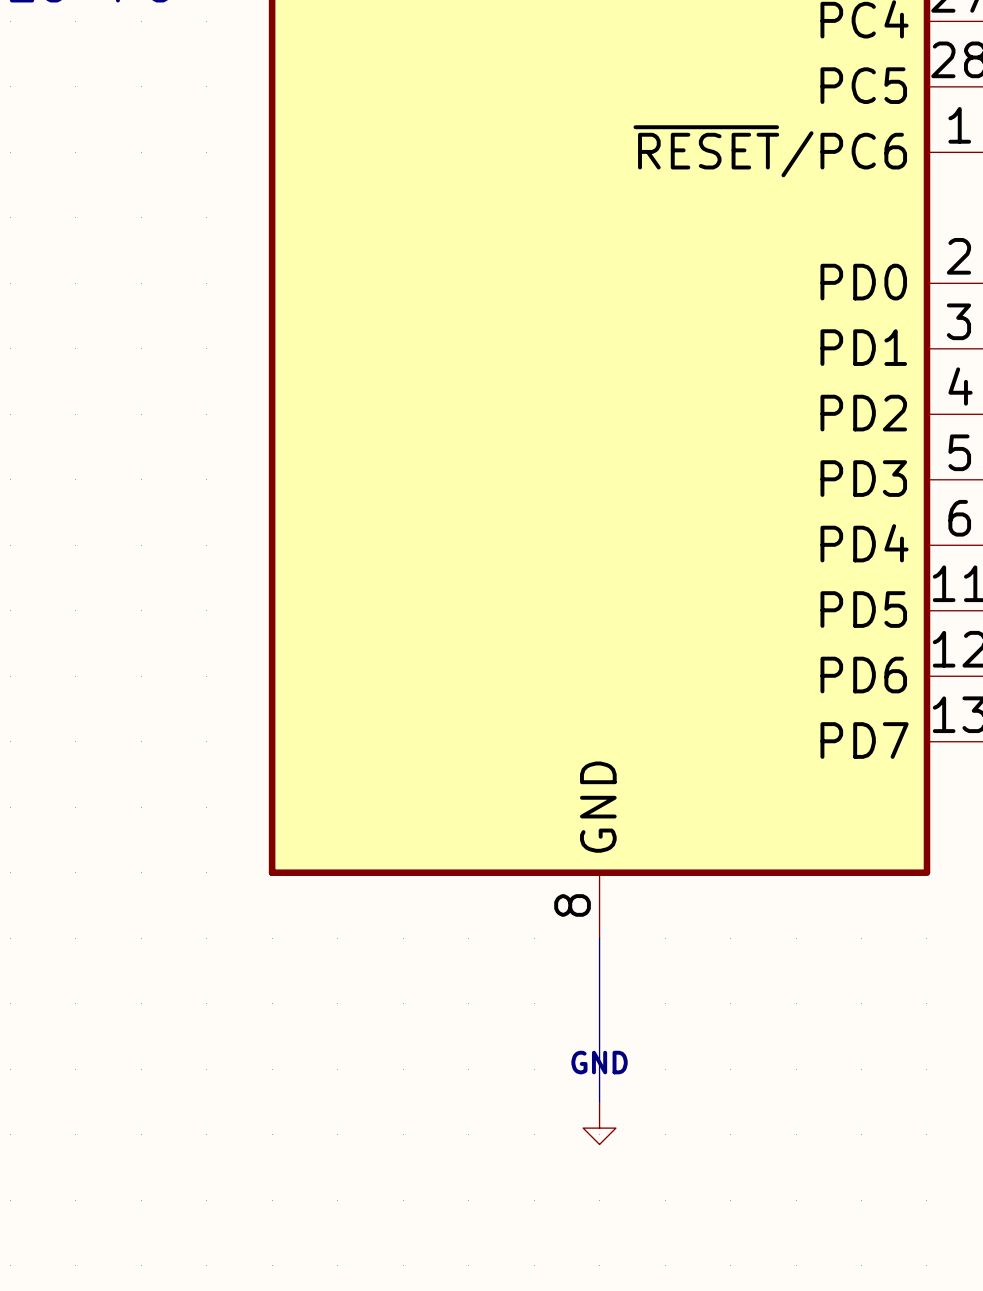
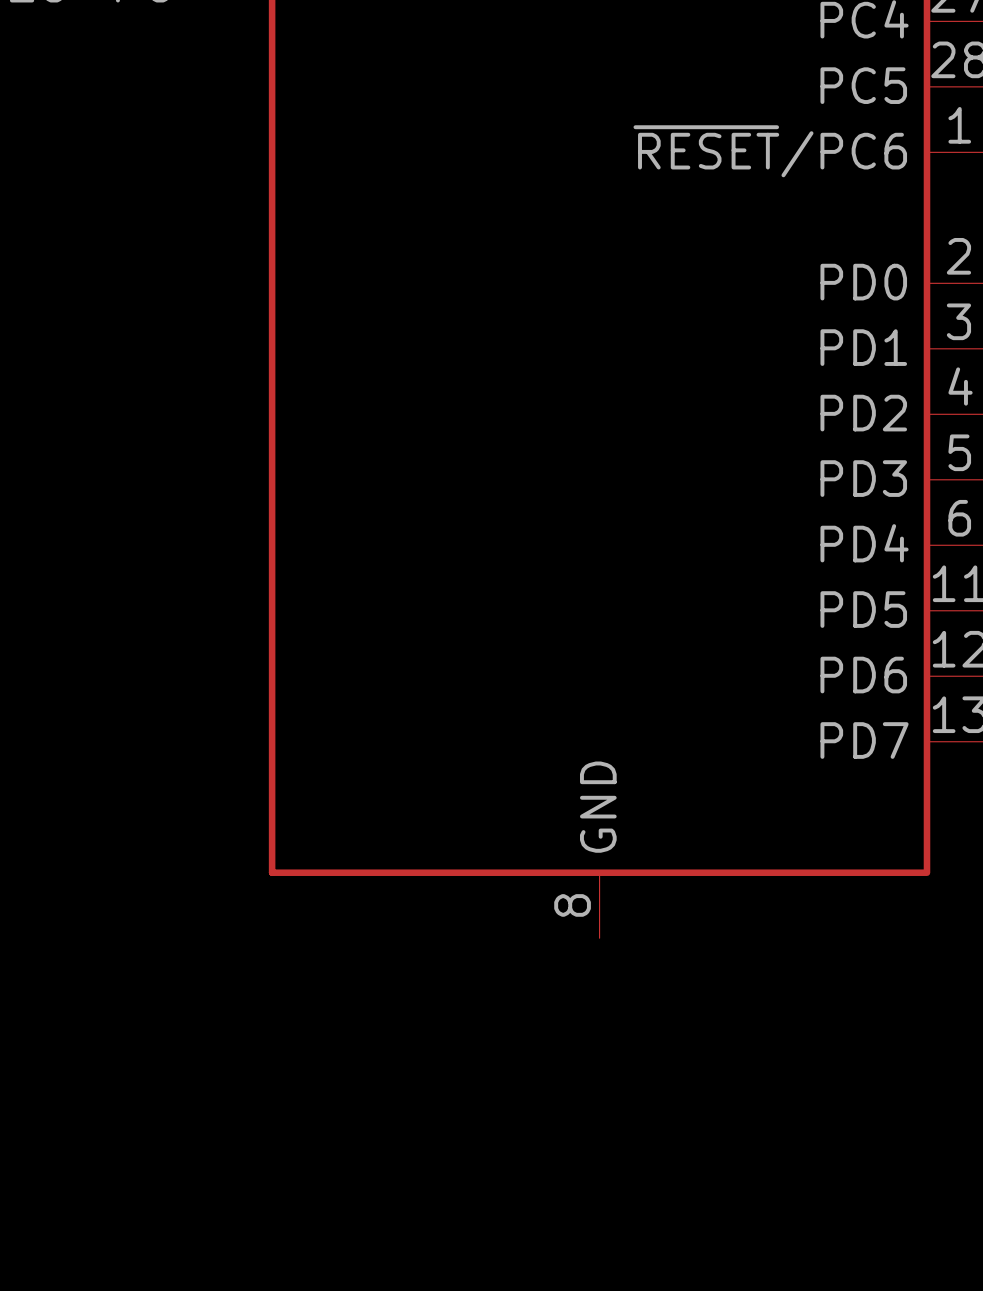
wire: (599, 938) (599, 1101) -> none
power symbol: GND (599, 1123) -> none

